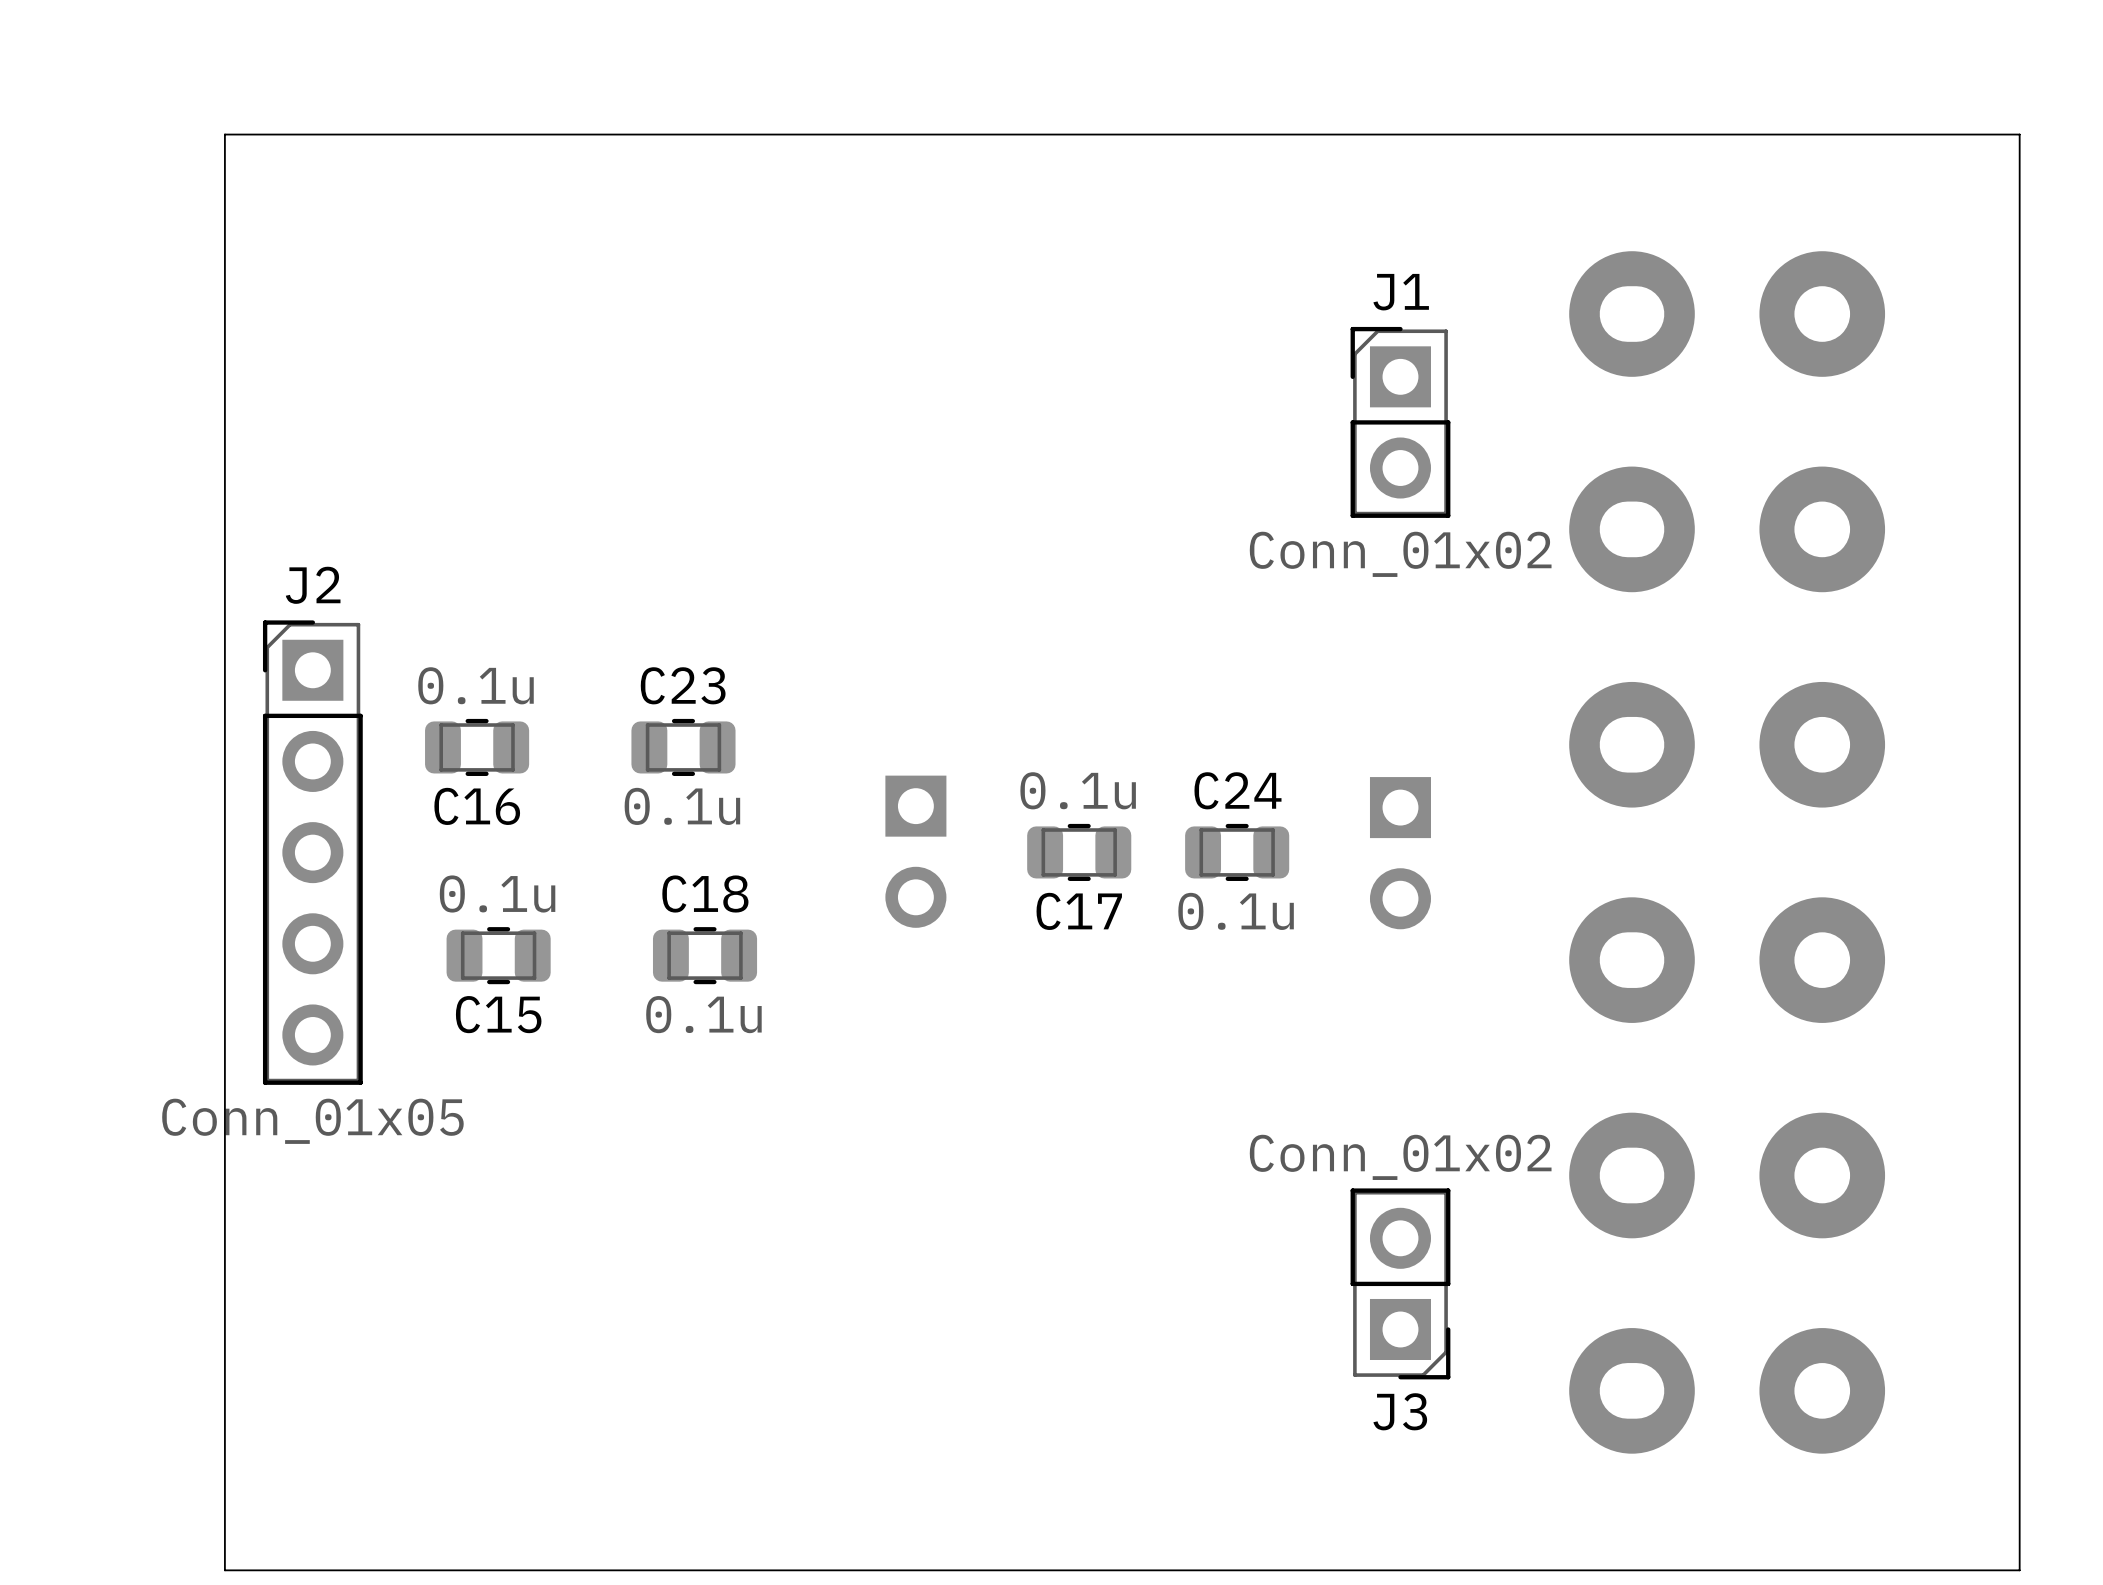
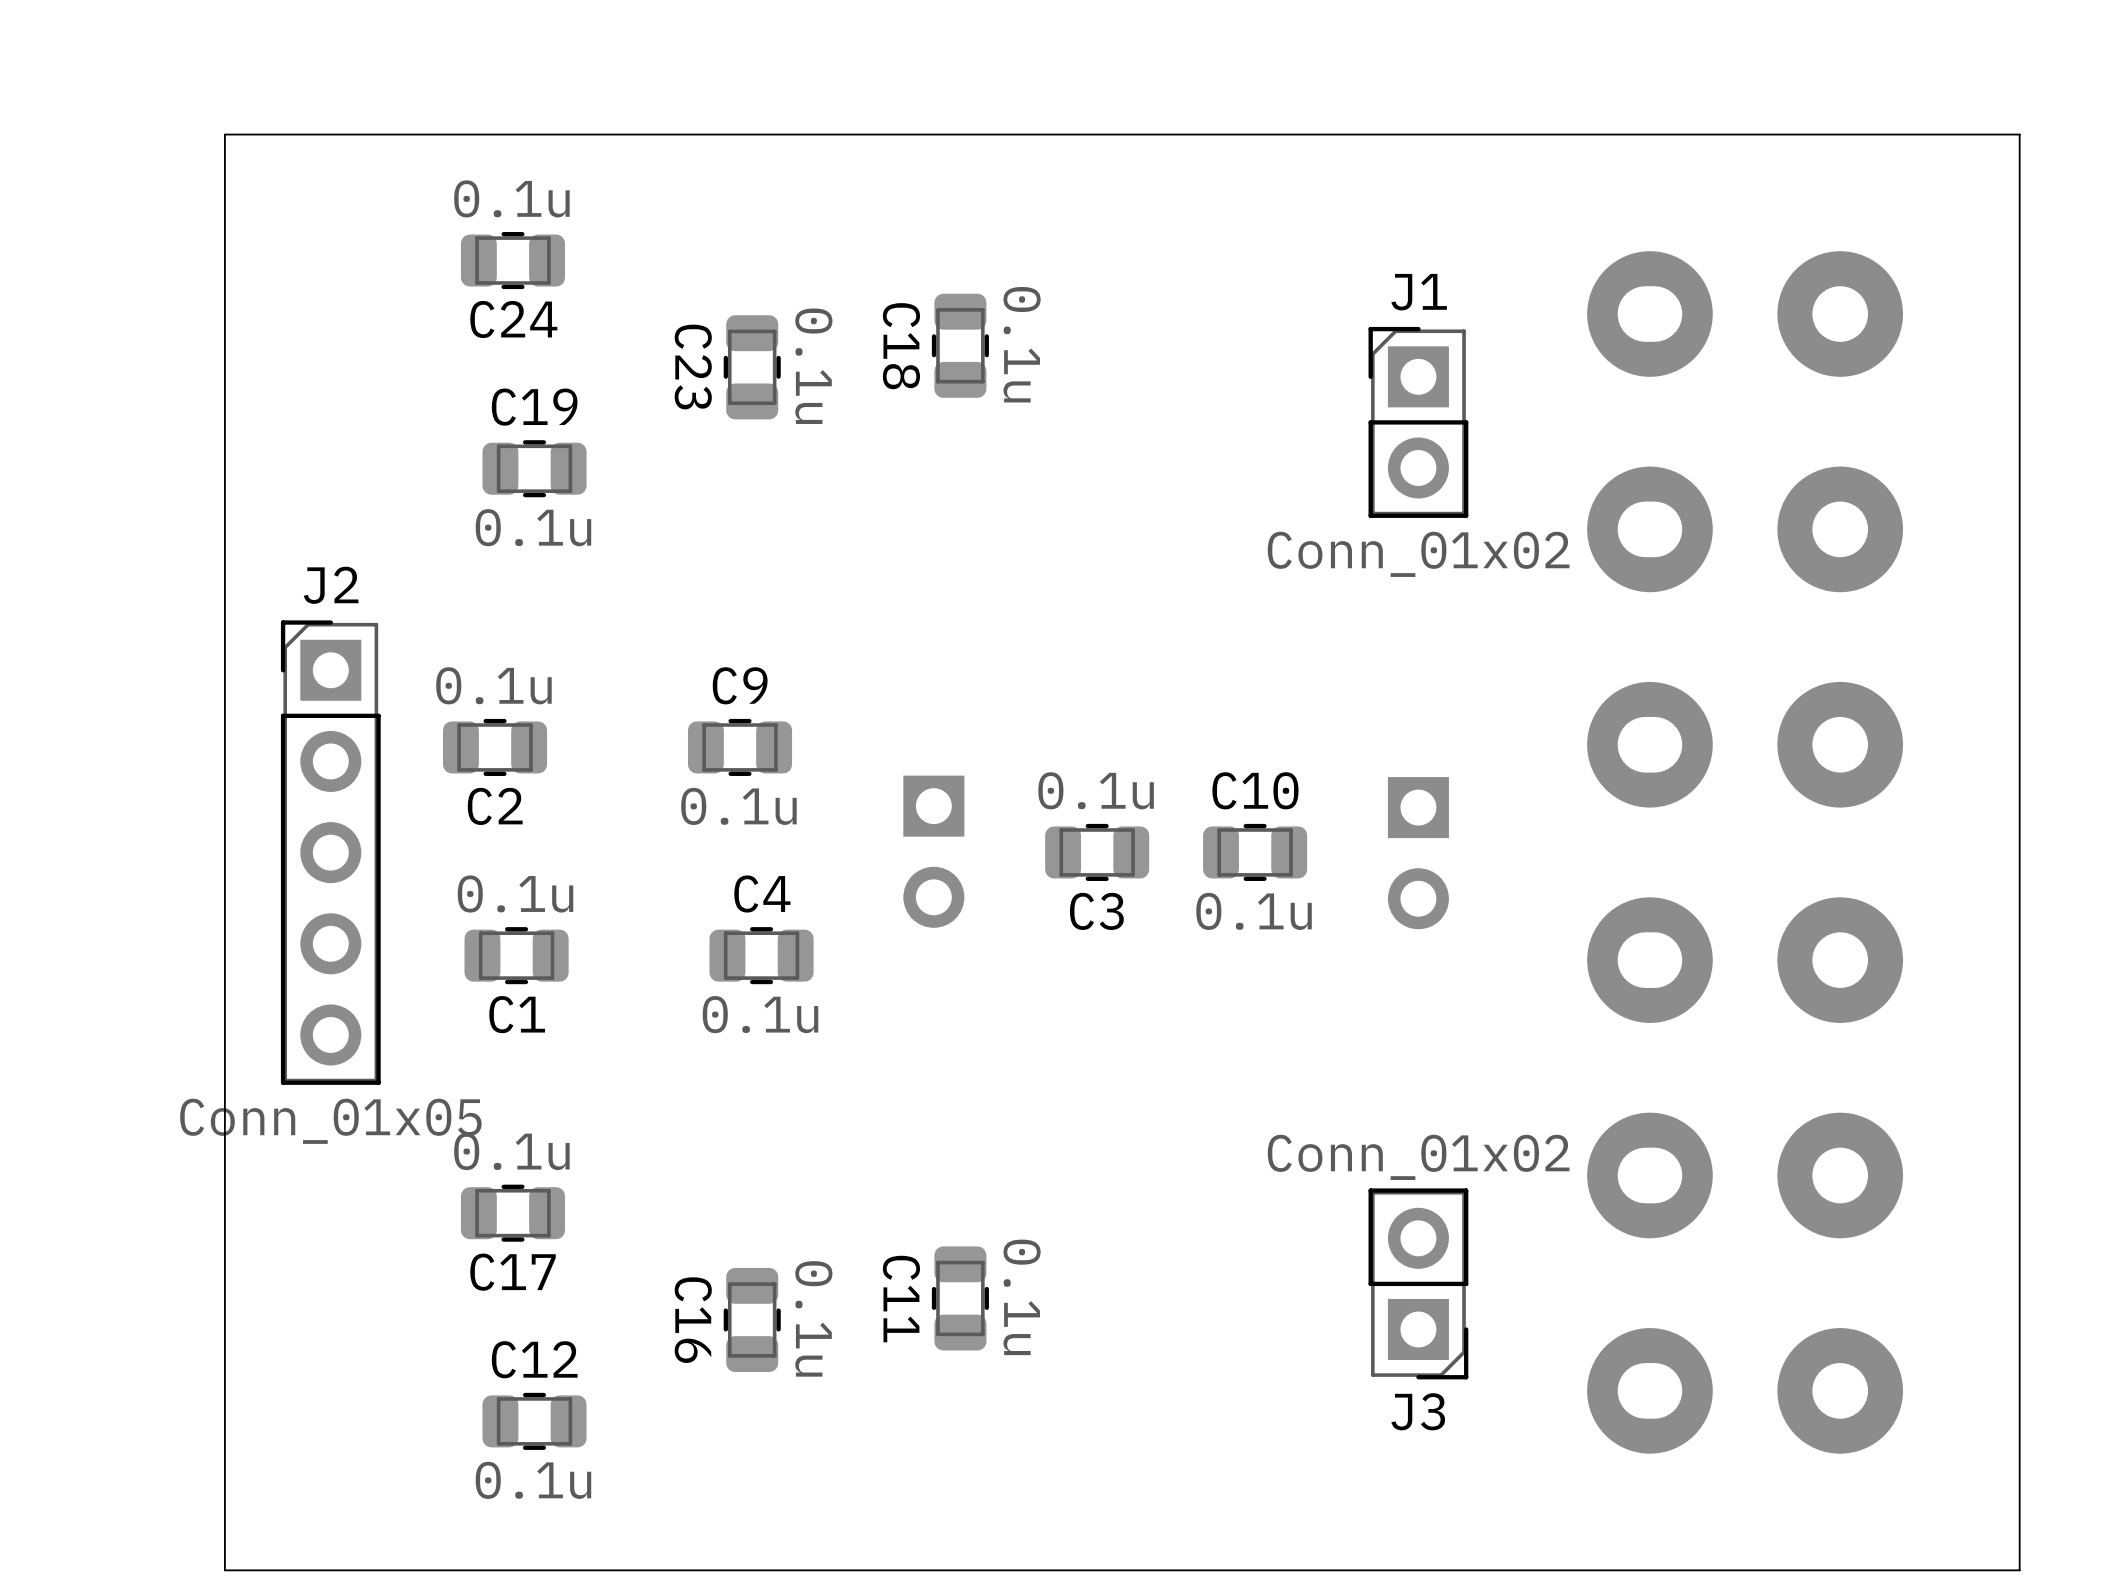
part position: (1727, 314) -> (1745, 314)
J1 position: (1400, 422) -> (1418, 422)
C19: none -> 0.1u (534, 468)
part position: (1727, 529) -> (1745, 529)
C23 name position: C23 (683, 685) -> C23 (693, 367)
part position: (1727, 744) -> (1745, 744)
C16 rotation: 0° (477, 747) -> 90° clockwise (752, 1319)
C16 position: (477, 747) -> (752, 1319)
C2: none -> 0.1u (495, 747)
C23 rotation: 0° (683, 747) -> 90° clockwise (752, 367)
C23 position: (683, 747) -> (752, 367)
C9: none -> 0.1u (740, 747)
C24 name position: C24 (1237, 790) -> C24 (513, 319)
C23 value position: 0.1u (682, 806) -> 0.1u (813, 366)
part position: (915, 851) -> (933, 851)
J2 position: (312, 852) -> (330, 852)
C17 position: (1079, 852) -> (512, 1213)
C3: none -> 0.1u (1097, 852)
C24 position: (1237, 852) -> (512, 260)
C10: none -> 0.1u (1255, 852)
part position: (1400, 853) -> (1418, 853)
C18 name position: C18 (705, 893) -> C18 (901, 346)
C24 value position: 0.1u (1236, 911) -> 0.1u (511, 198)
C15 position: (498, 955) -> (516, 955)
C18 rotation: 0° (705, 955) -> 90° clockwise (960, 345)
C18 position: (705, 955) -> (960, 345)
C4: none -> 0.1u (761, 955)
part position: (1727, 960) -> (1745, 960)
C15 name: C15 (498, 1014) -> C1 (517, 1014)
C18 value position: 0.1u (703, 1014) -> 0.1u (1022, 344)
part position: (1727, 1175) -> (1745, 1175)
J3 position: (1400, 1283) -> (1418, 1283)
C11: none -> 0.1u (960, 1298)
part position: (1727, 1390) -> (1745, 1390)
C12: none -> 0.1u (534, 1421)

